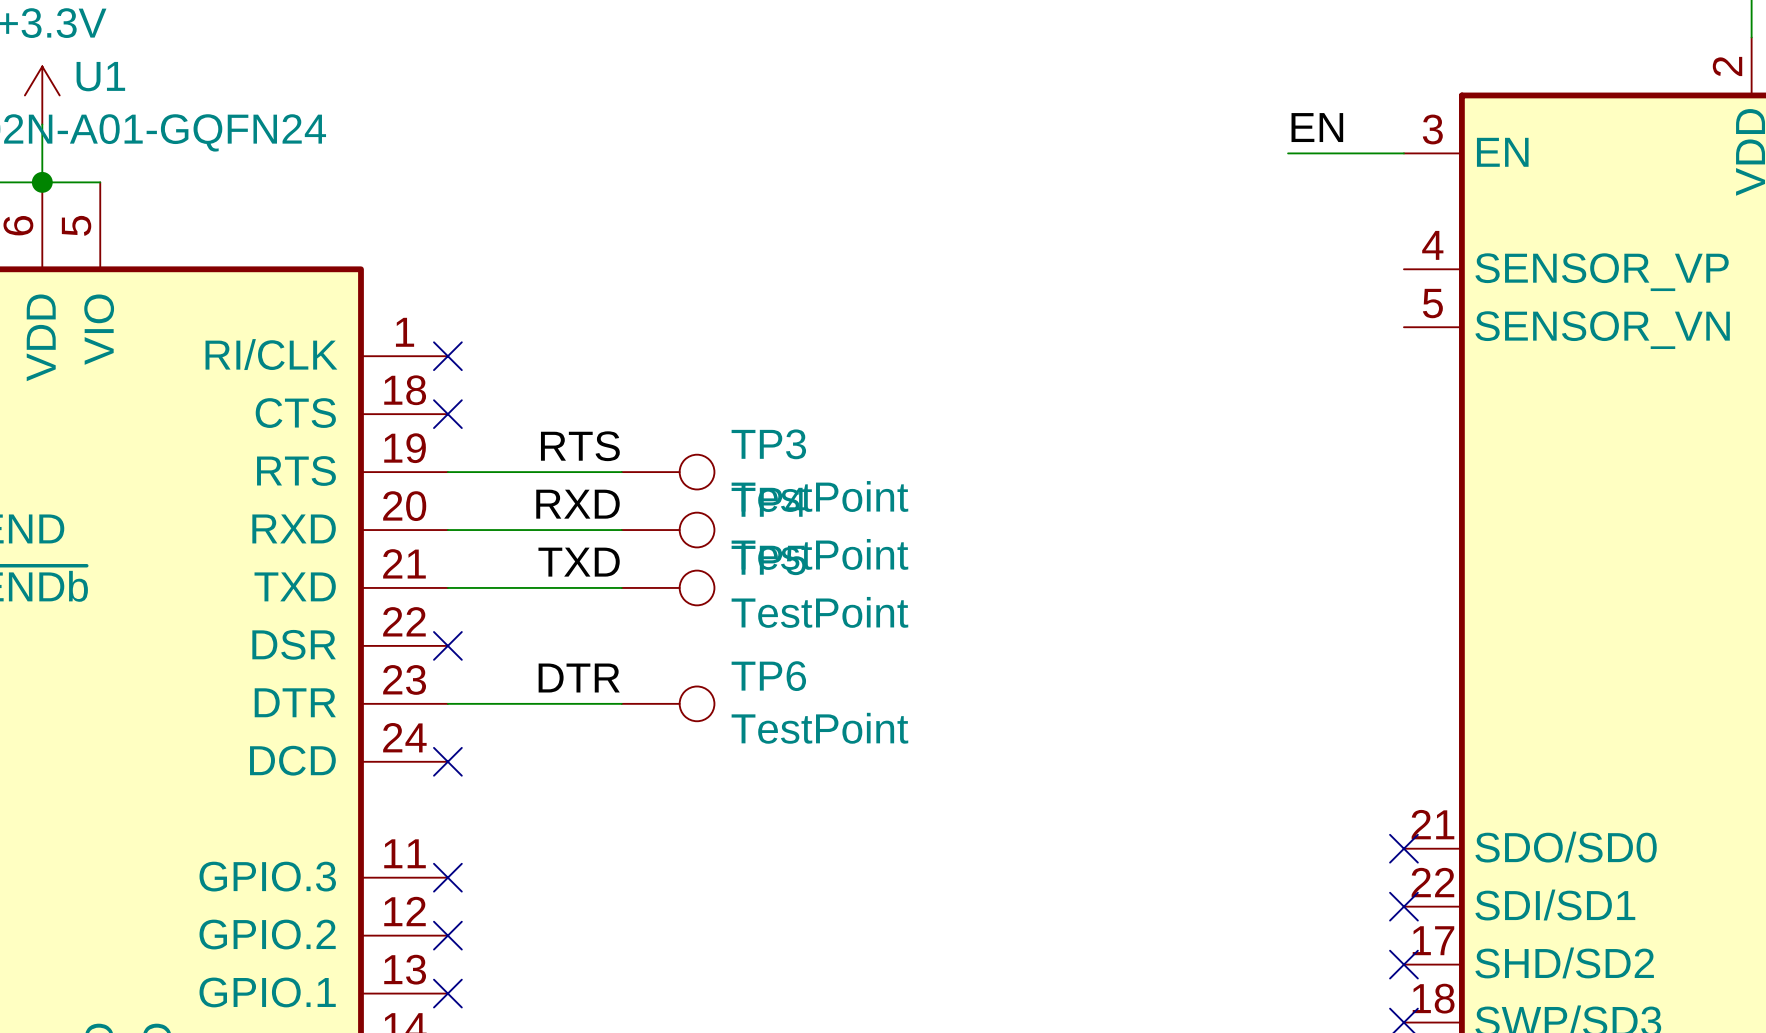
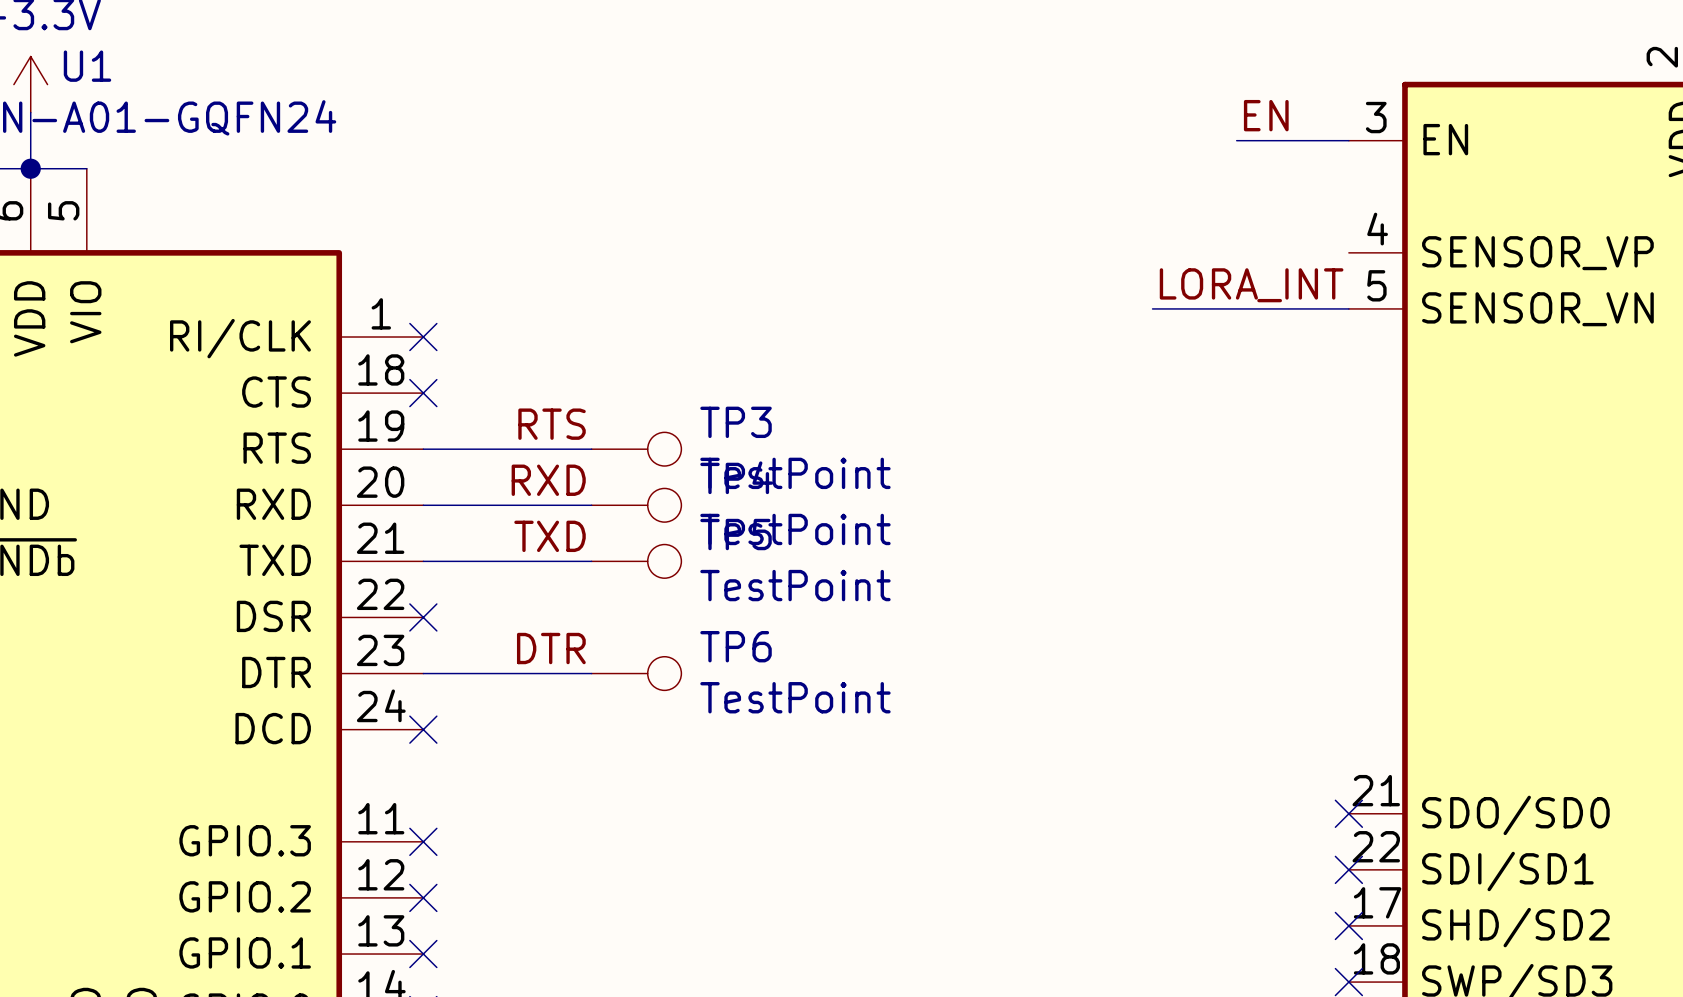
label: none -> LORA_INT (1251, 285)
wire: none -> (1152, 308) (1348, 308)

